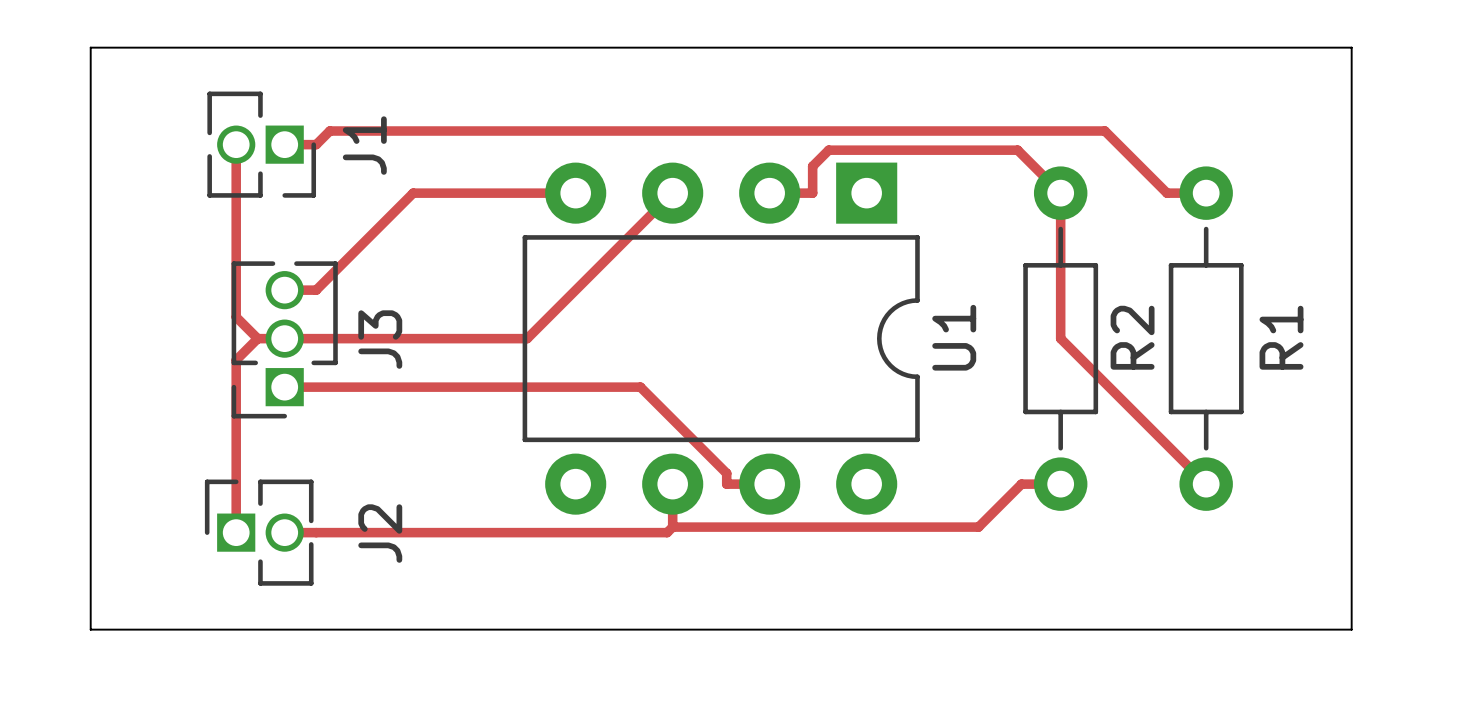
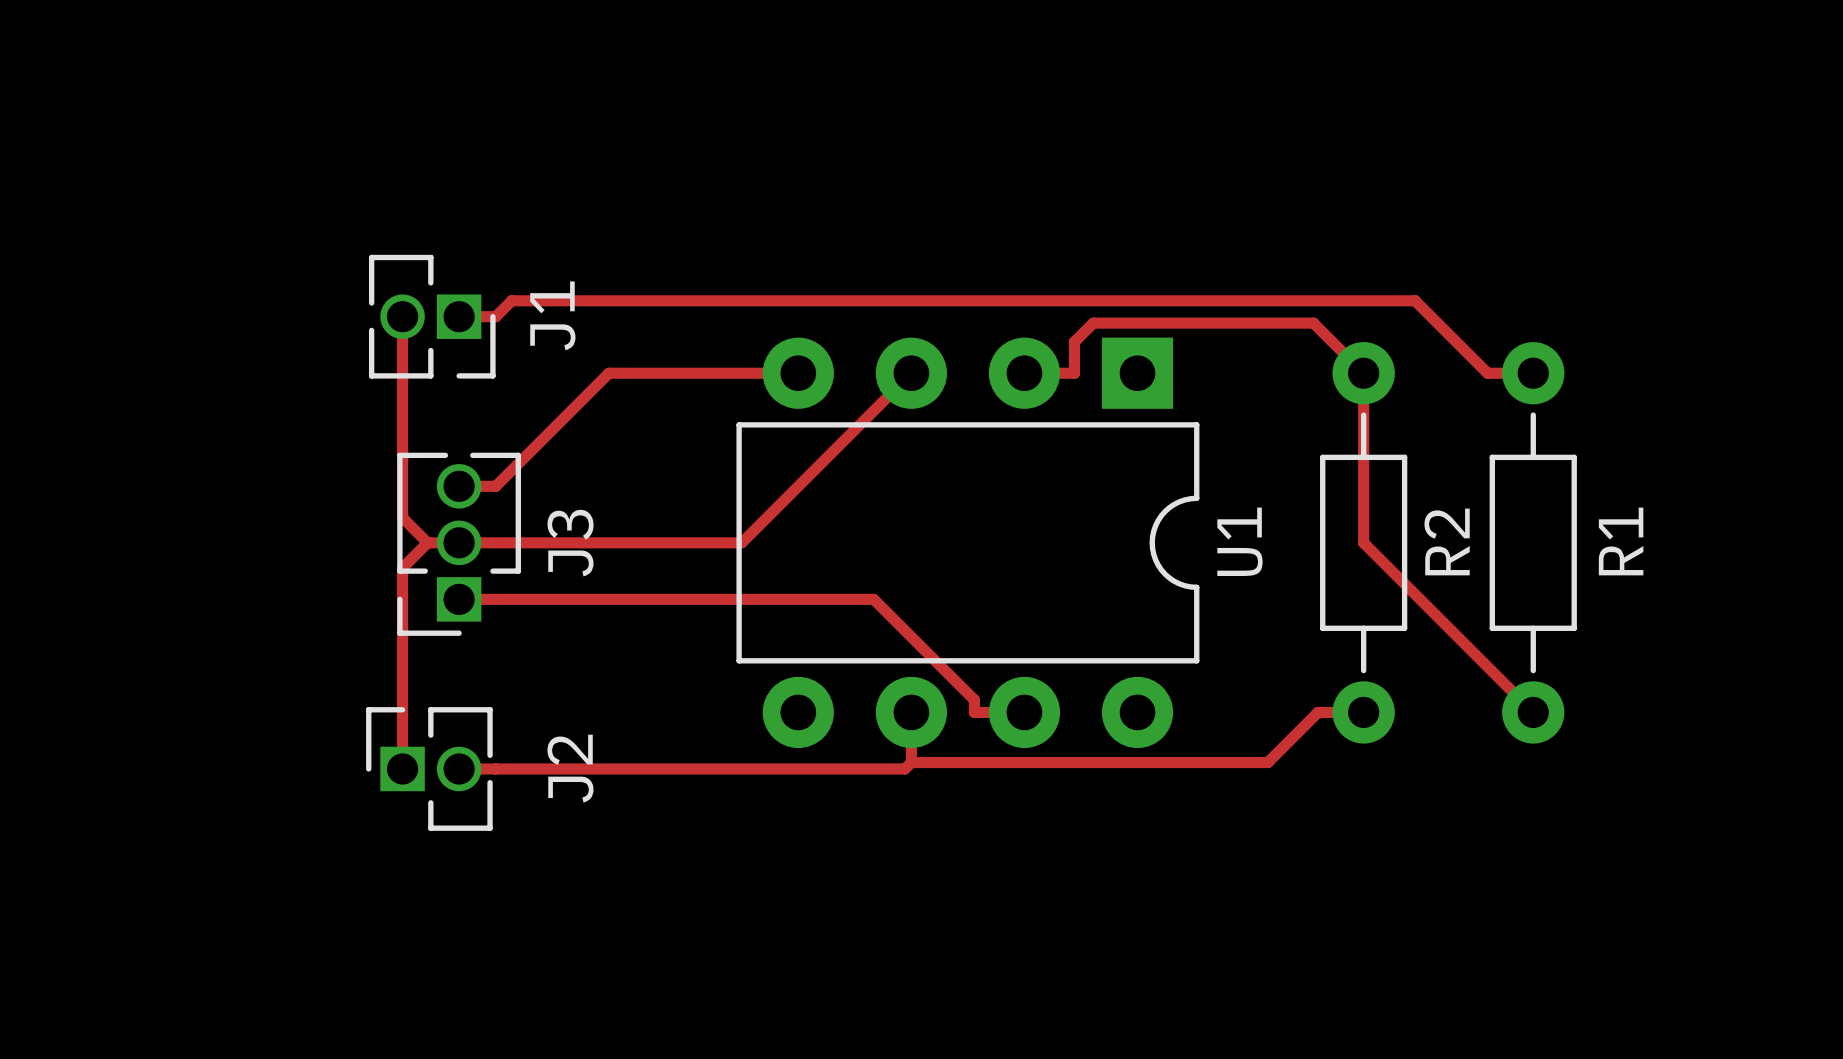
board edge: (90, 47) (1351, 47) (1351, 629) (90, 629) (90, 47) -> none

